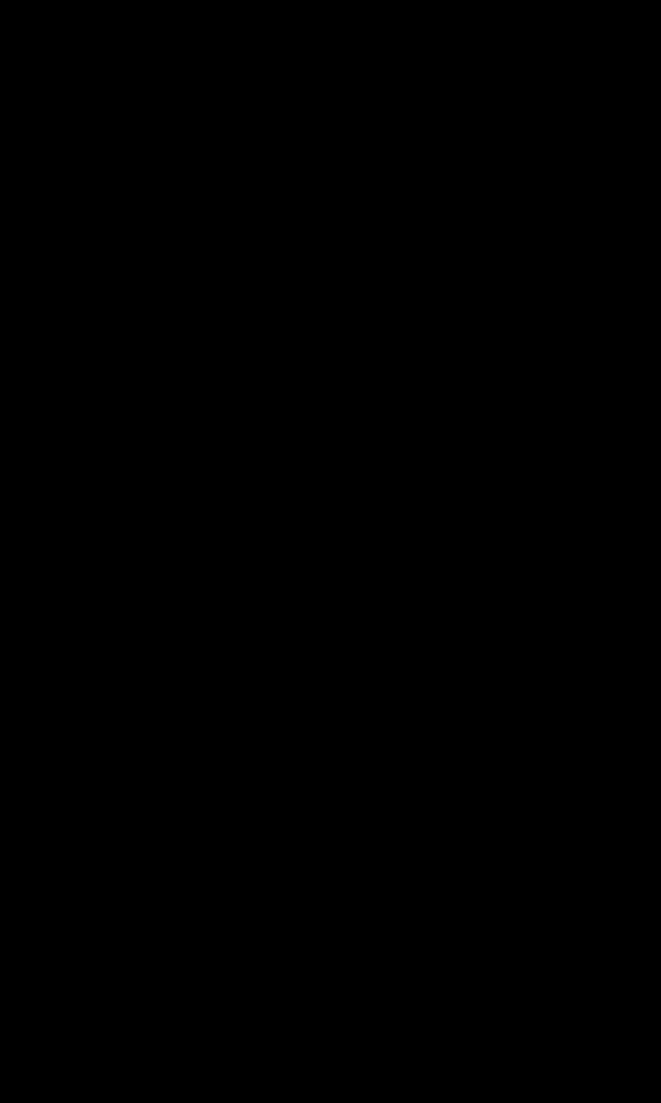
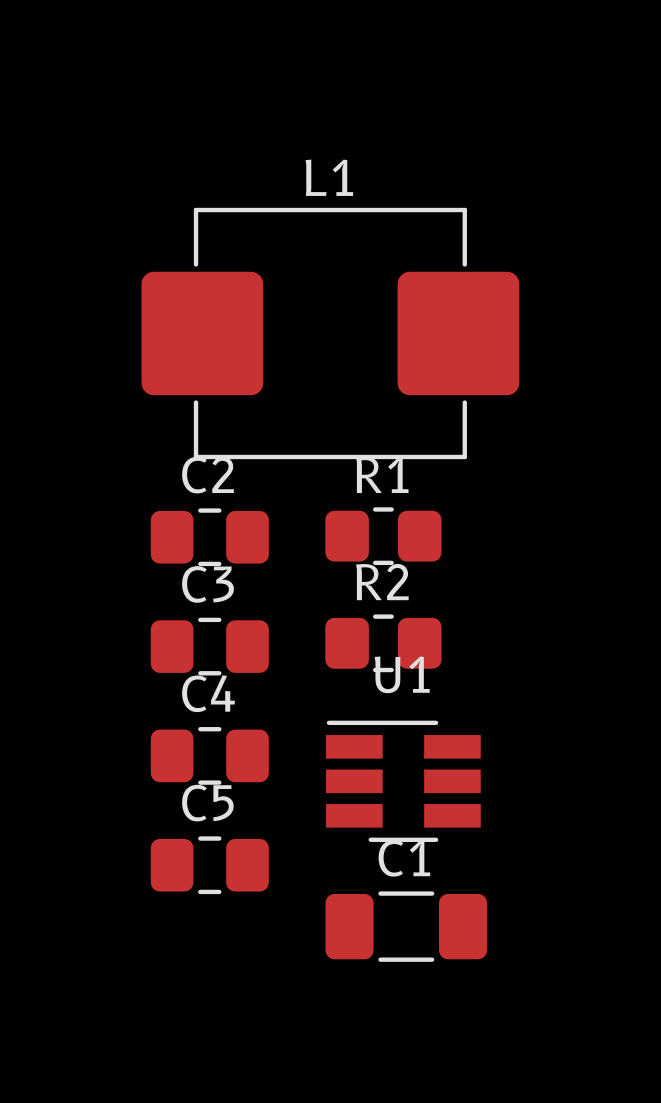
L1: none -> (330, 333)
R1: none -> (383, 536)
C2: none -> (209, 537)
R2: none -> (383, 643)
C3: none -> (209, 646)
C4: none -> (209, 755)
U1: none -> (403, 781)
C5: none -> (209, 865)
C1: none -> (406, 926)

